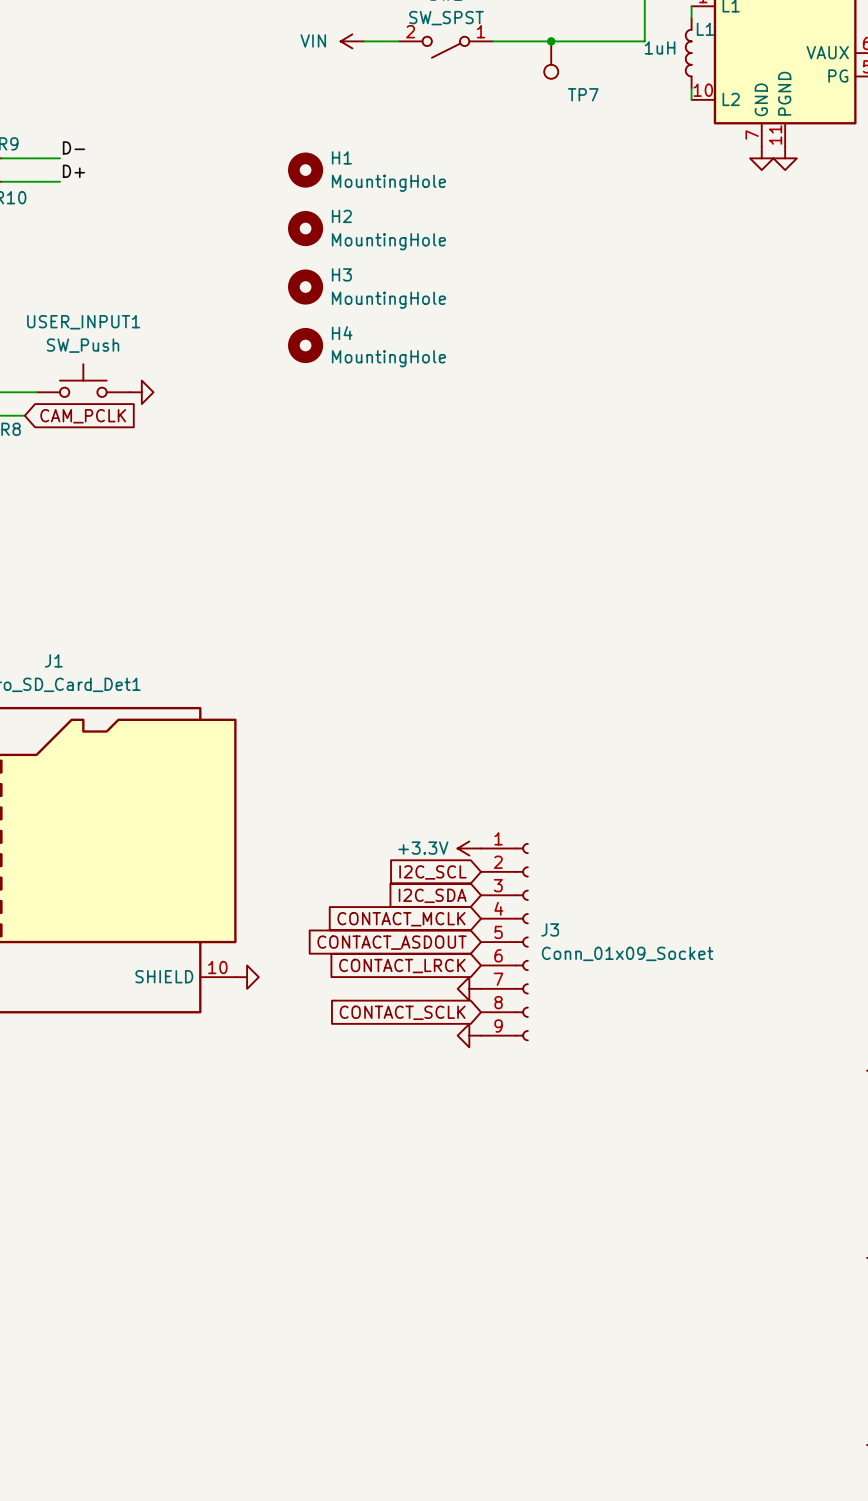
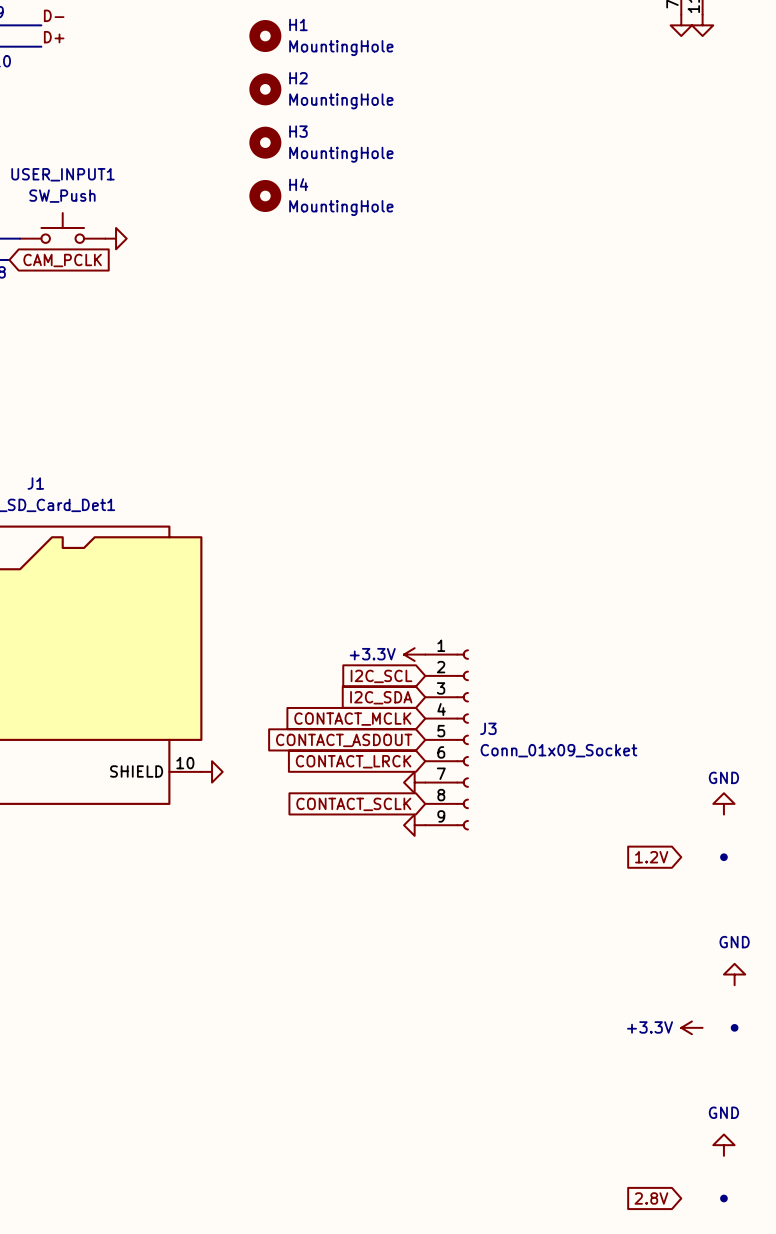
power symbol: none -> GND (723, 803)
global label: none -> 1.2V (651, 857)
junction: none -> (723, 857)
power symbol: none -> GND (734, 974)
power symbol: none -> +3.3V (691, 1027)
junction: none -> (734, 1027)
power symbol: none -> GND (723, 1145)
global label: none -> 2.8V (651, 1198)
junction: none -> (723, 1198)

